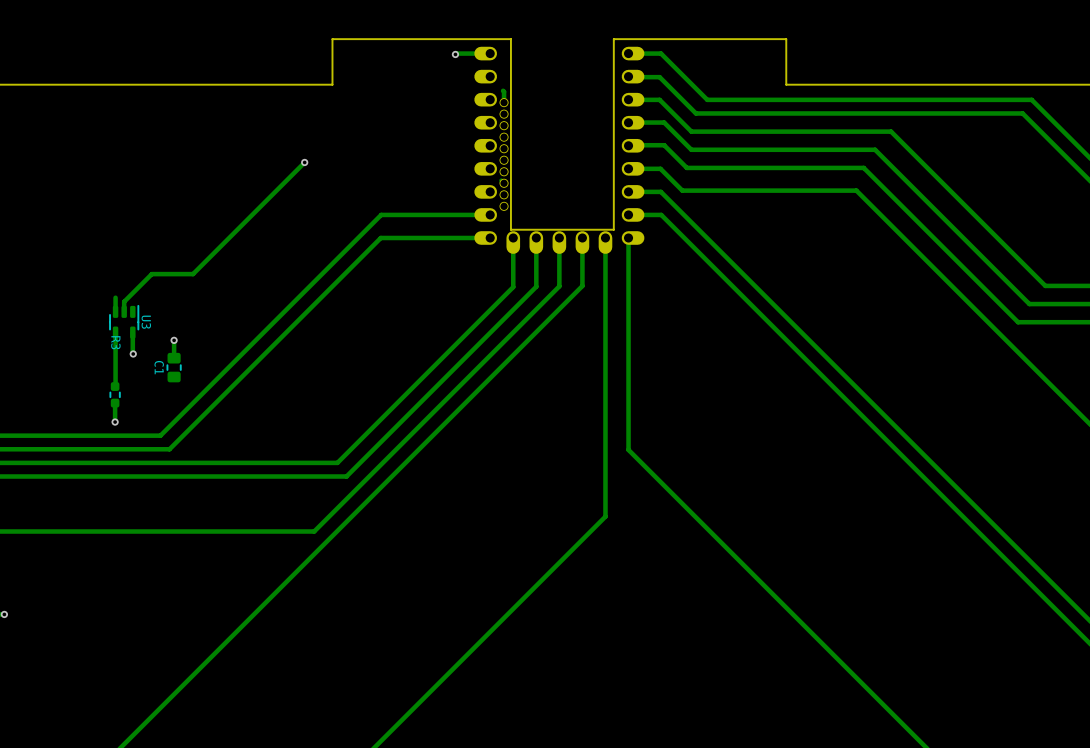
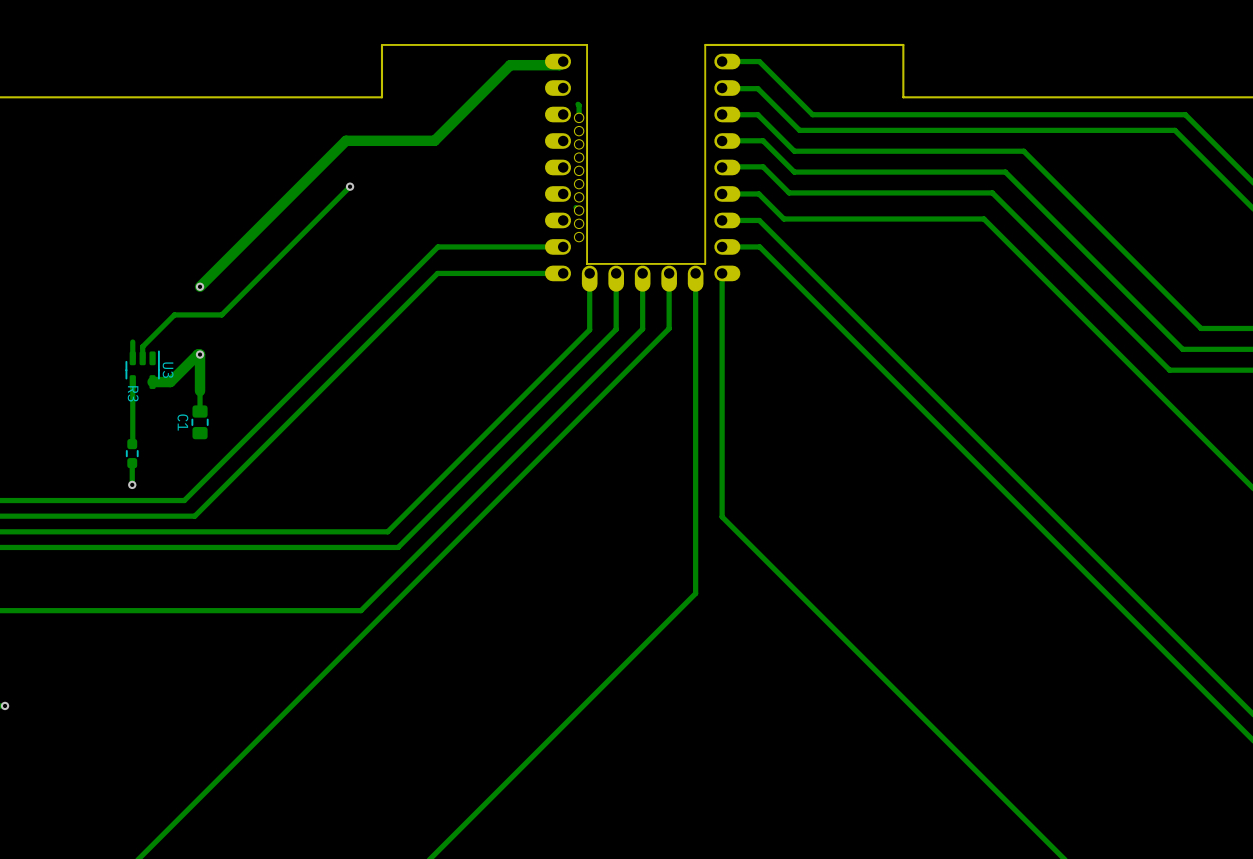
track: (490, 53) (455, 54) -> (563, 61) (559, 65) (510, 65) (434, 140) (346, 140) (200, 286)
via: (455, 54) -> none
via: none -> (200, 286)
via: none -> (200, 354)
track: (132, 332) (133, 353) -> (152, 382) (170, 382) (200, 354) (200, 391)
via: (174, 340) -> none
via: (133, 353) -> none

